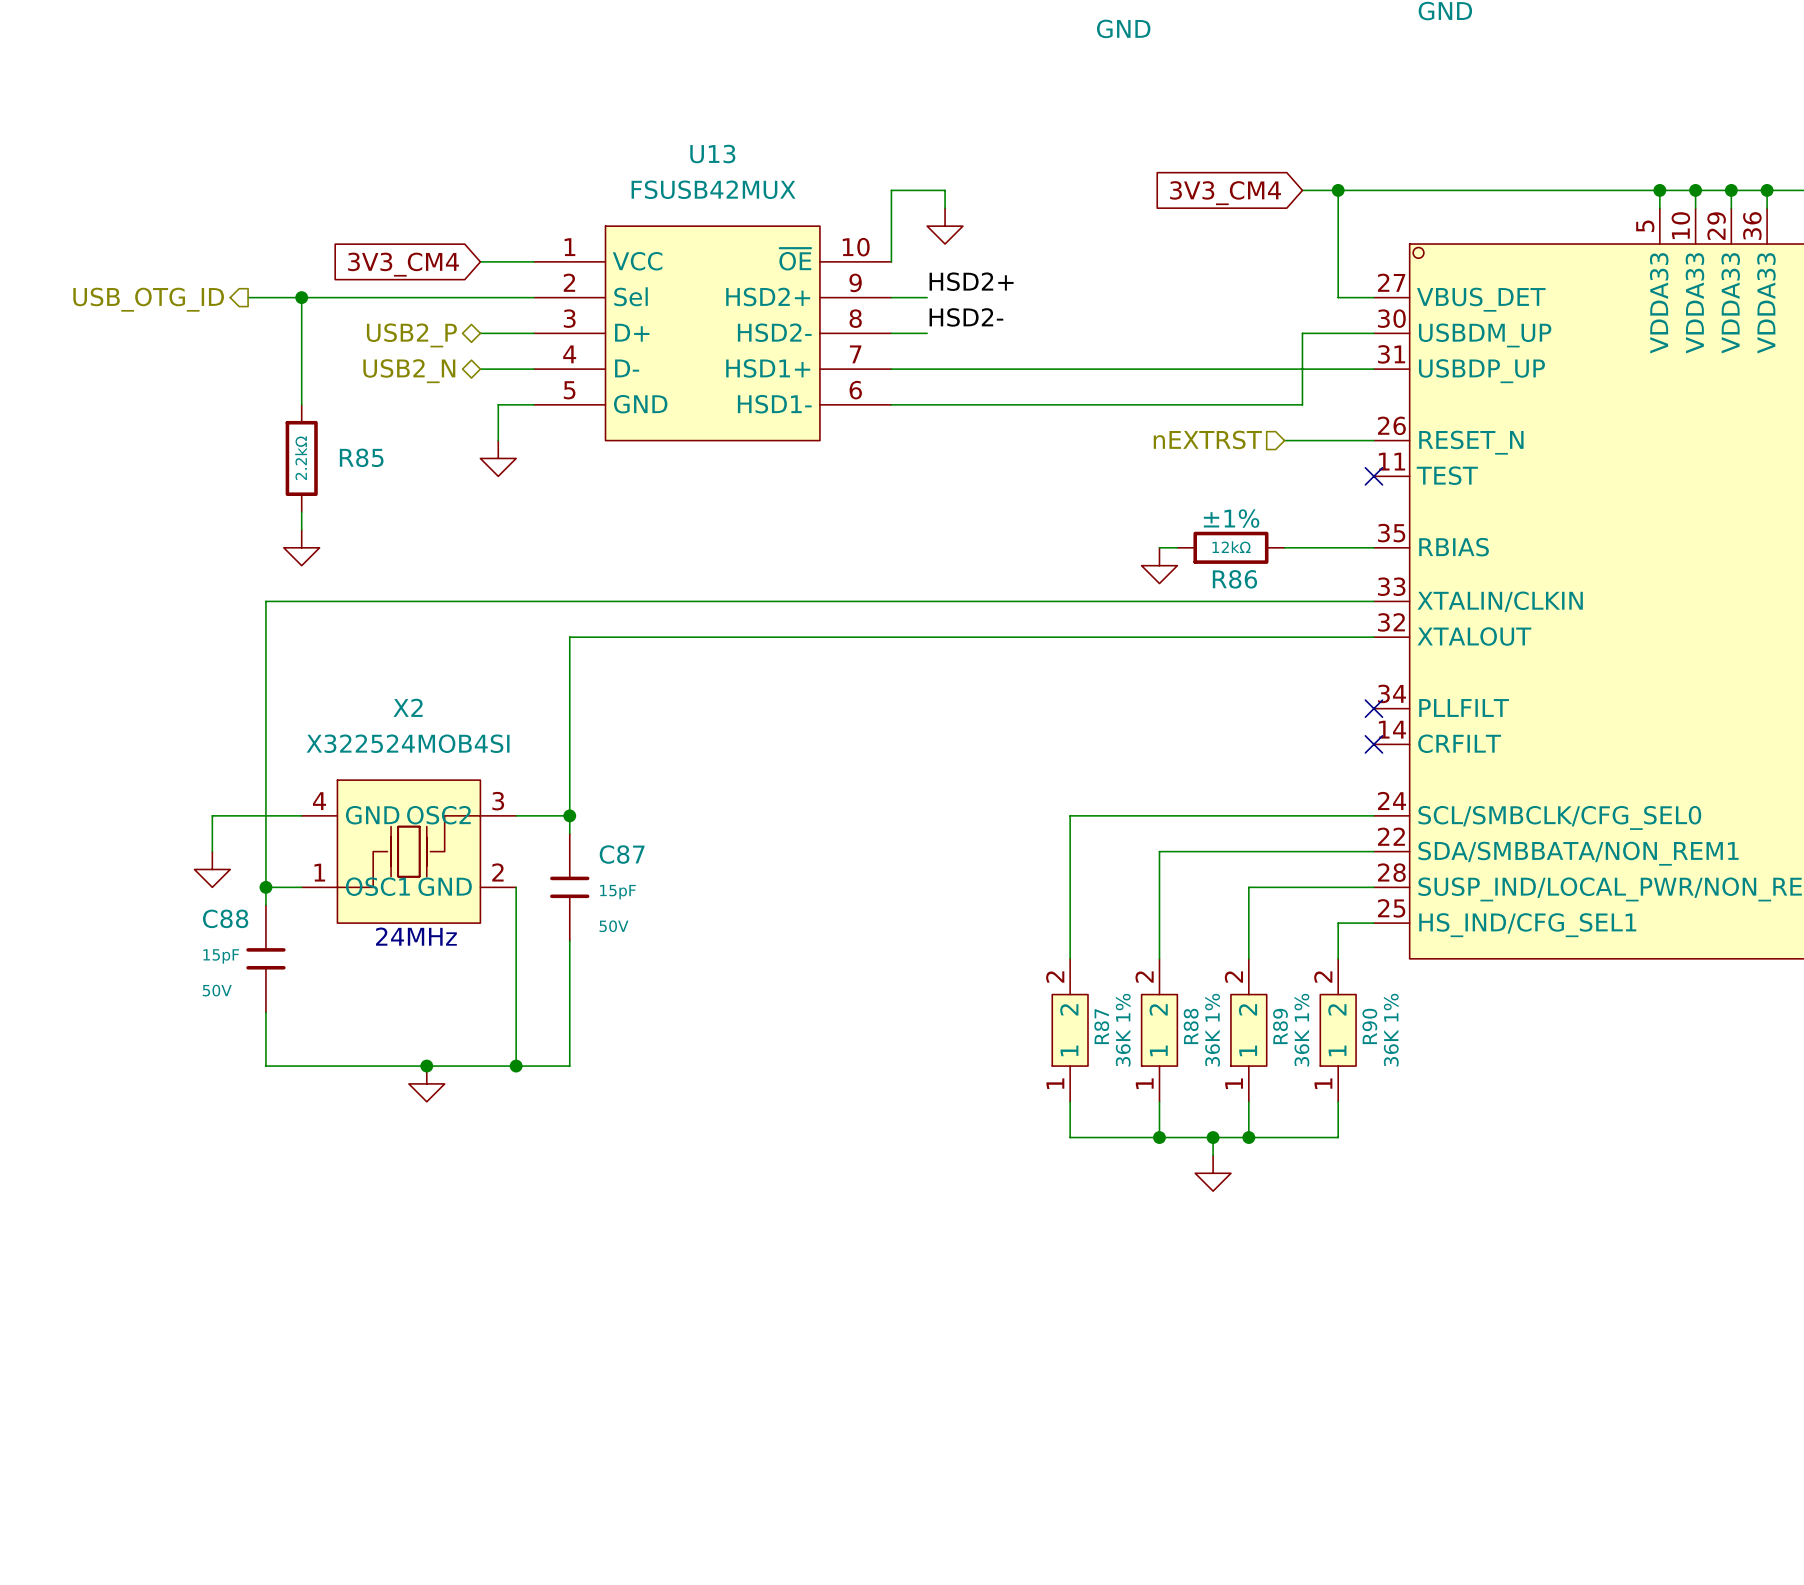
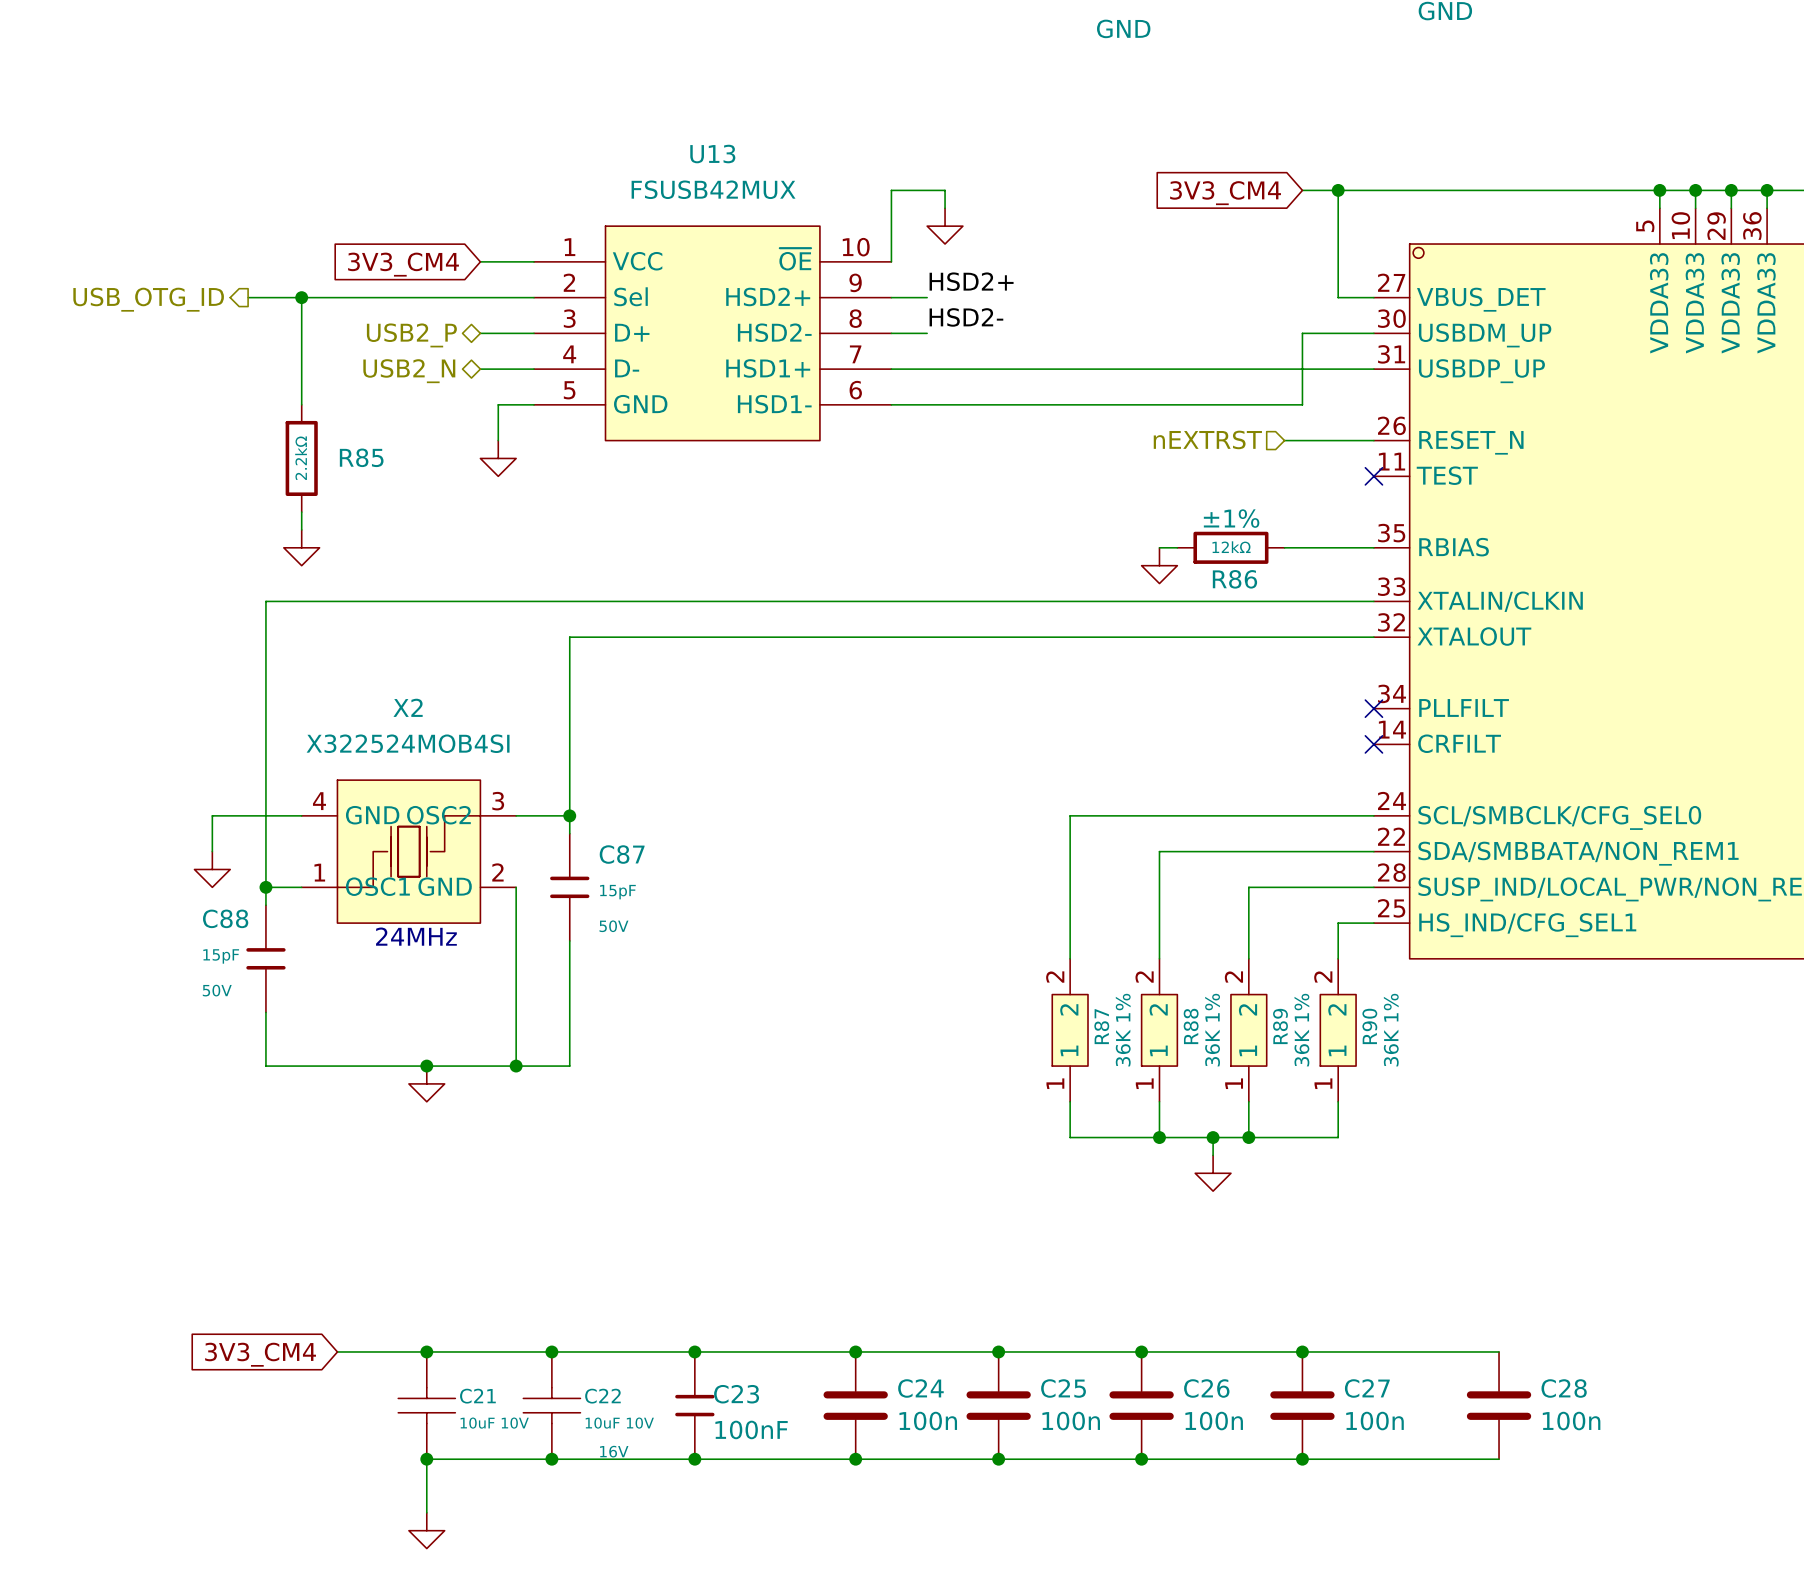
wire: none -> (337, 1351) (1499, 1351)
junction: none -> (426, 1351)
junction: none -> (551, 1351)
junction: none -> (694, 1351)
junction: none -> (855, 1351)
junction: none -> (998, 1351)
junction: none -> (1141, 1351)
junction: none -> (1302, 1351)
global label: none -> 3V3_CM4 (260, 1354)
C21: none -> 10uF 10V (426, 1405)
C22: none -> 10uF 10V (551, 1405)
C23: none -> 100nF (694, 1405)
C24: none -> 100n (855, 1405)
C25: none -> 100n (998, 1405)
C26: none -> 100n (1141, 1405)
C27: none -> 100n (1302, 1405)
C28: none -> 100n (1499, 1405)
junction: none -> (426, 1459)
junction: none -> (551, 1459)
junction: none -> (694, 1459)
junction: none -> (855, 1459)
junction: none -> (998, 1459)
junction: none -> (1141, 1459)
junction: none -> (1302, 1459)
wire: none -> (1499, 1459) (426, 1459) (426, 1512)
power symbol: none -> (426, 1530)

